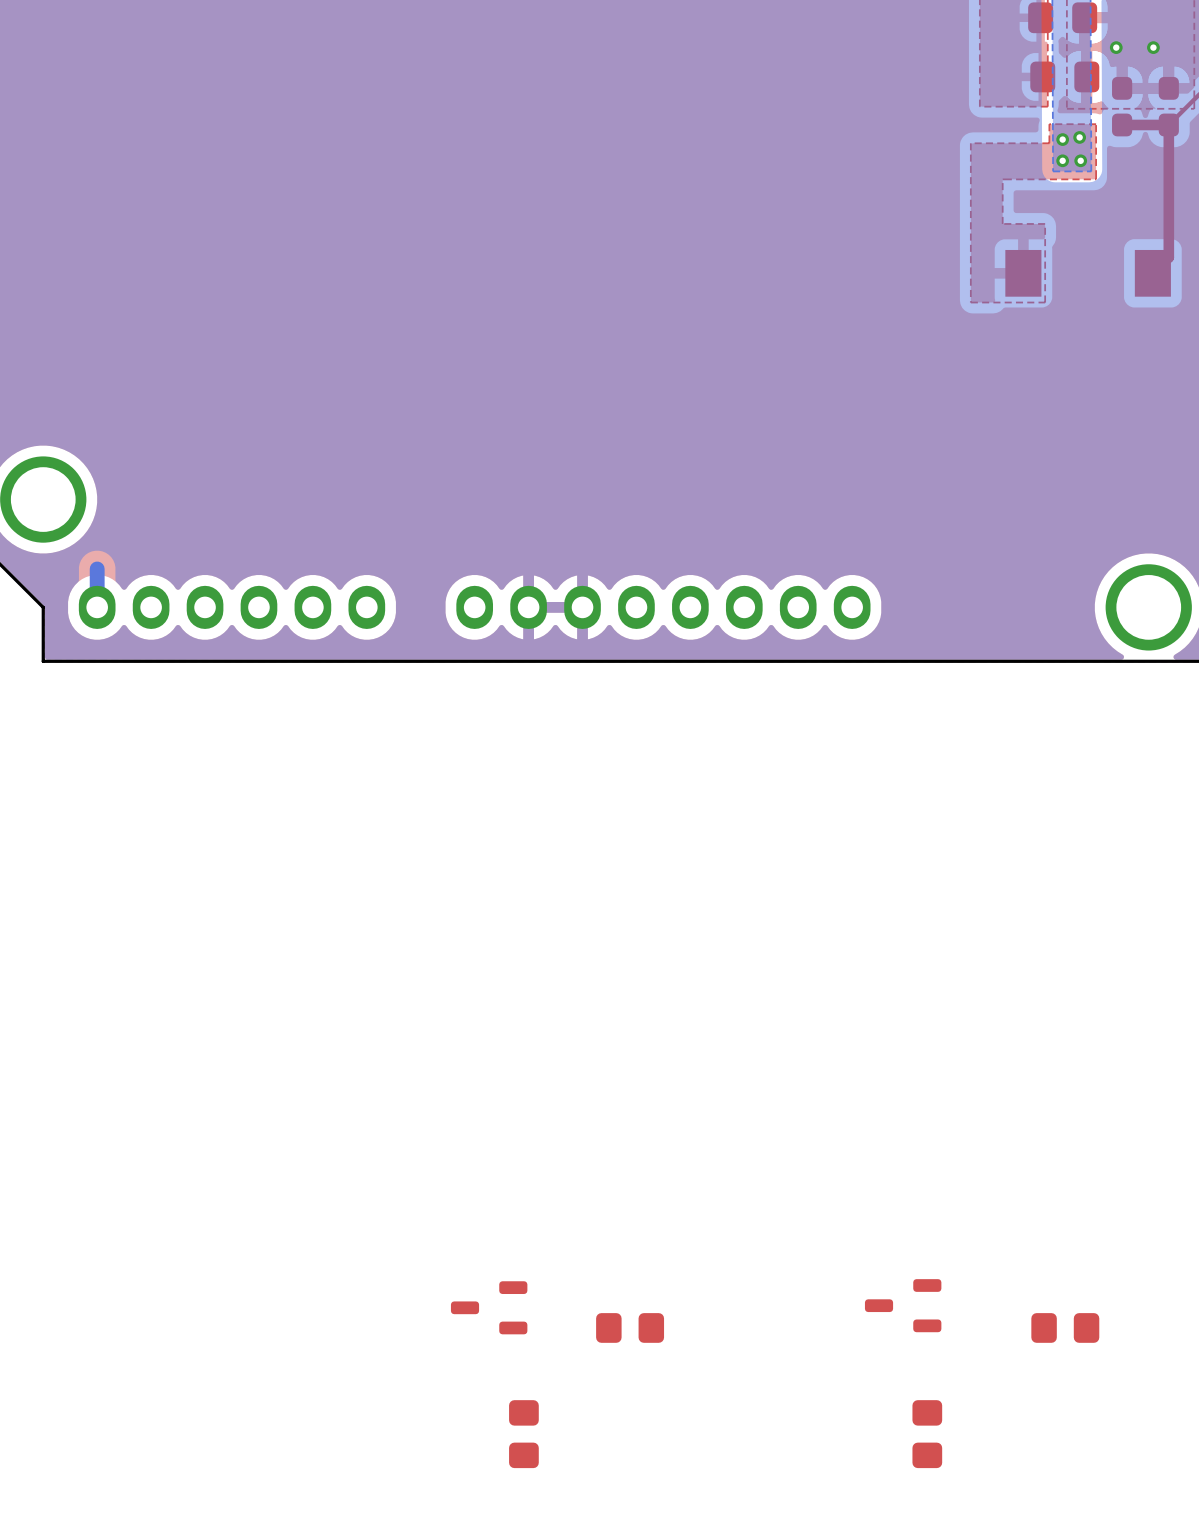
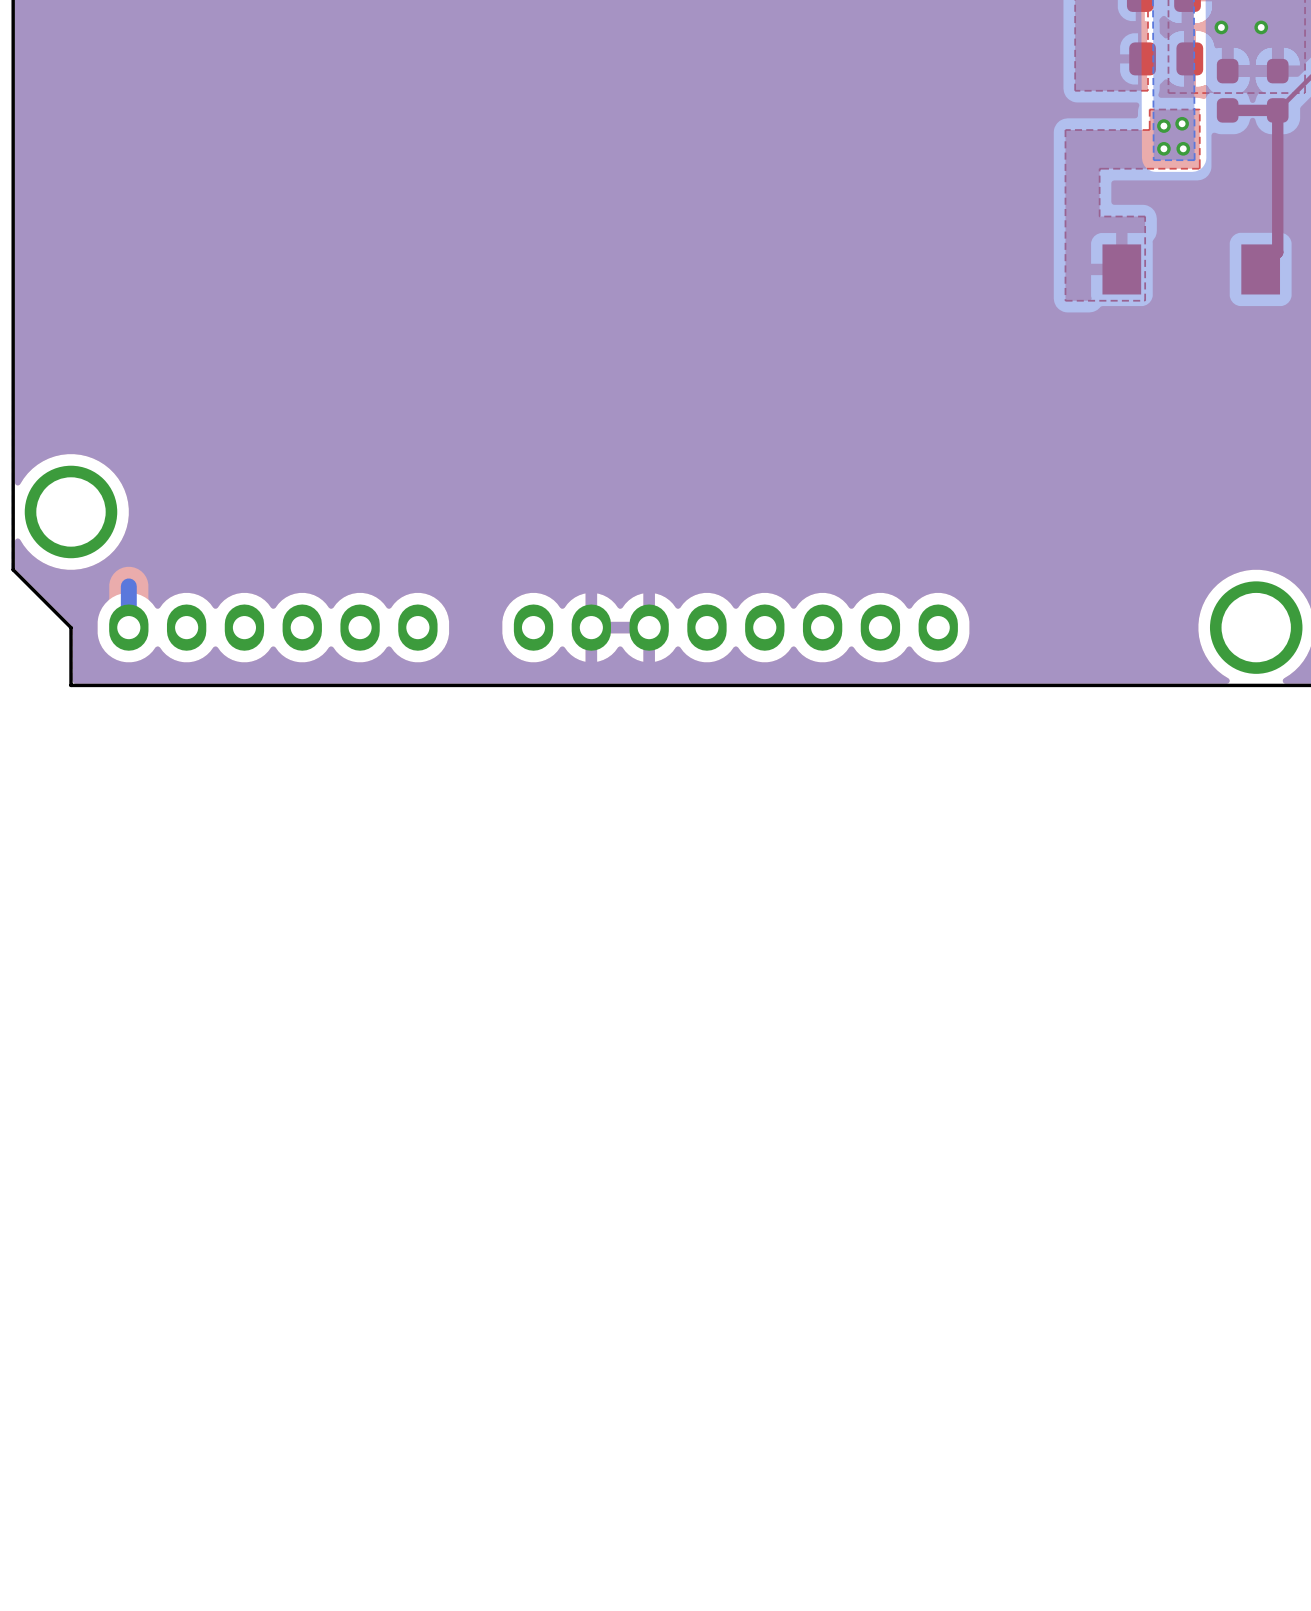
part: (903, 1305) -> none
part: (489, 1307) -> none
part: (630, 1327) -> none
part: (1065, 1327) -> none
part: (523, 1434) -> none
part: (927, 1434) -> none

